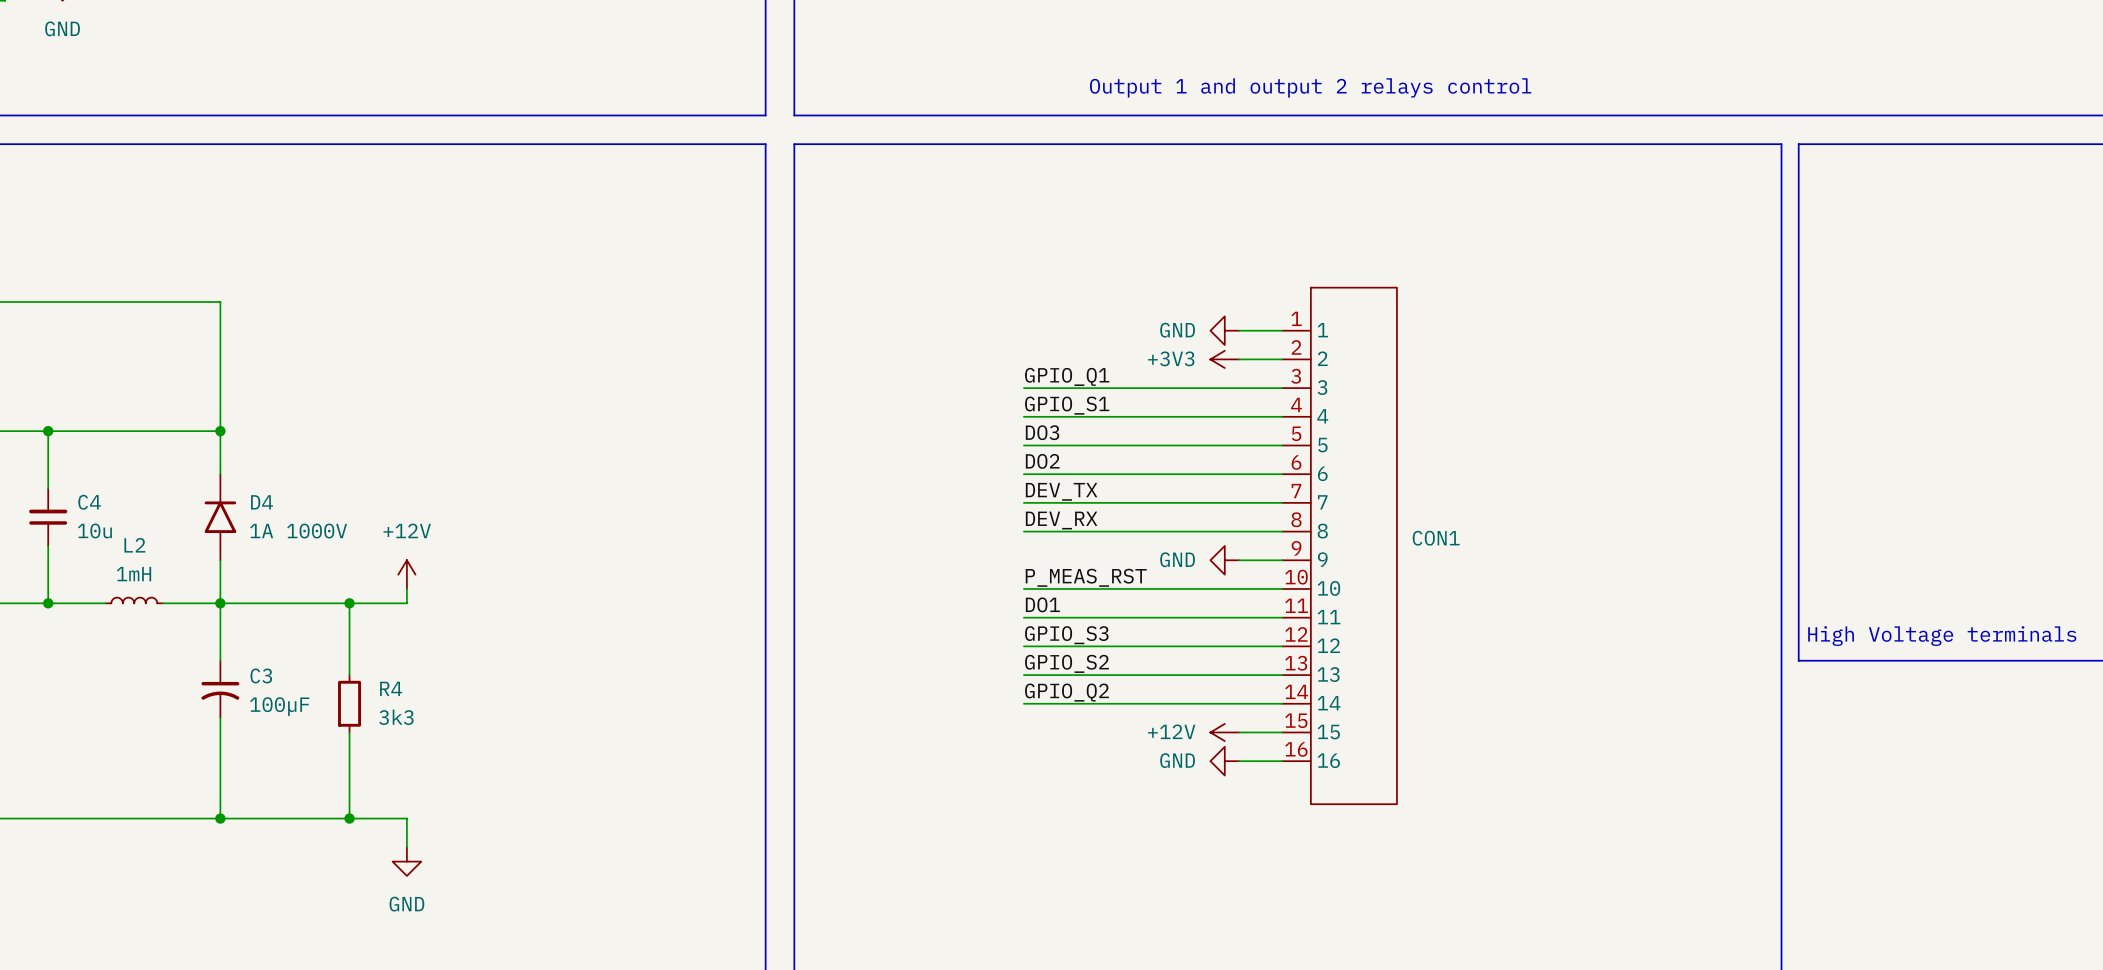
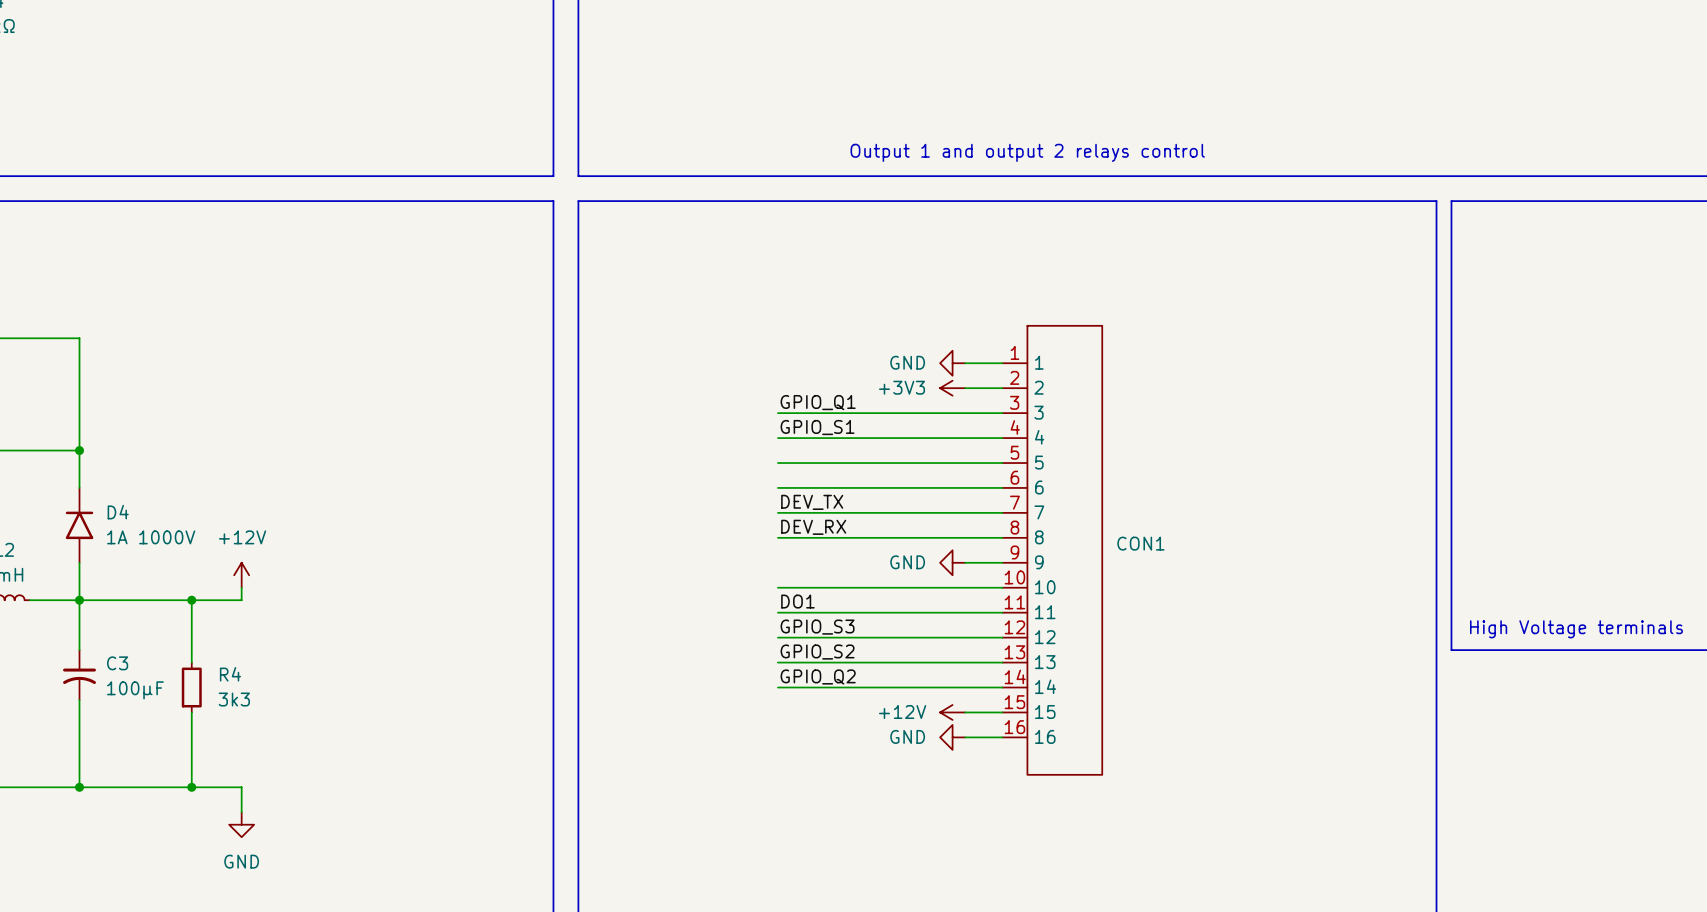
label: DO3 (1042, 432) -> none
label: DO2 (1042, 461) -> none
label: P_MEAS_RST (1086, 577) -> none

